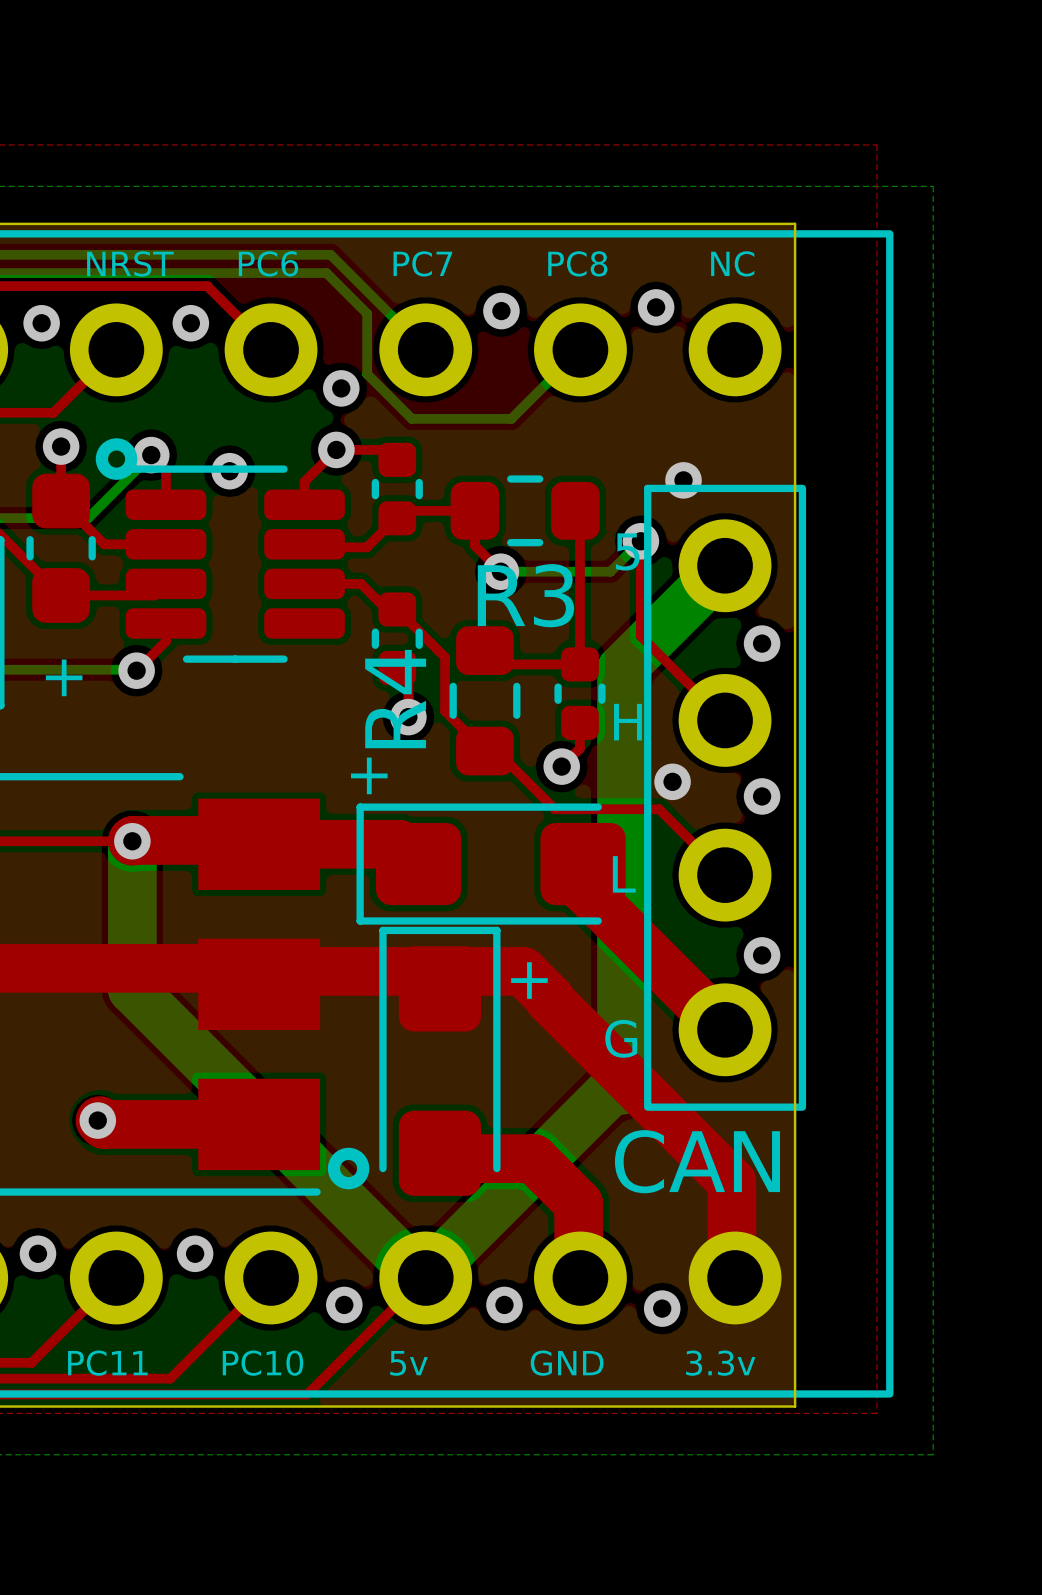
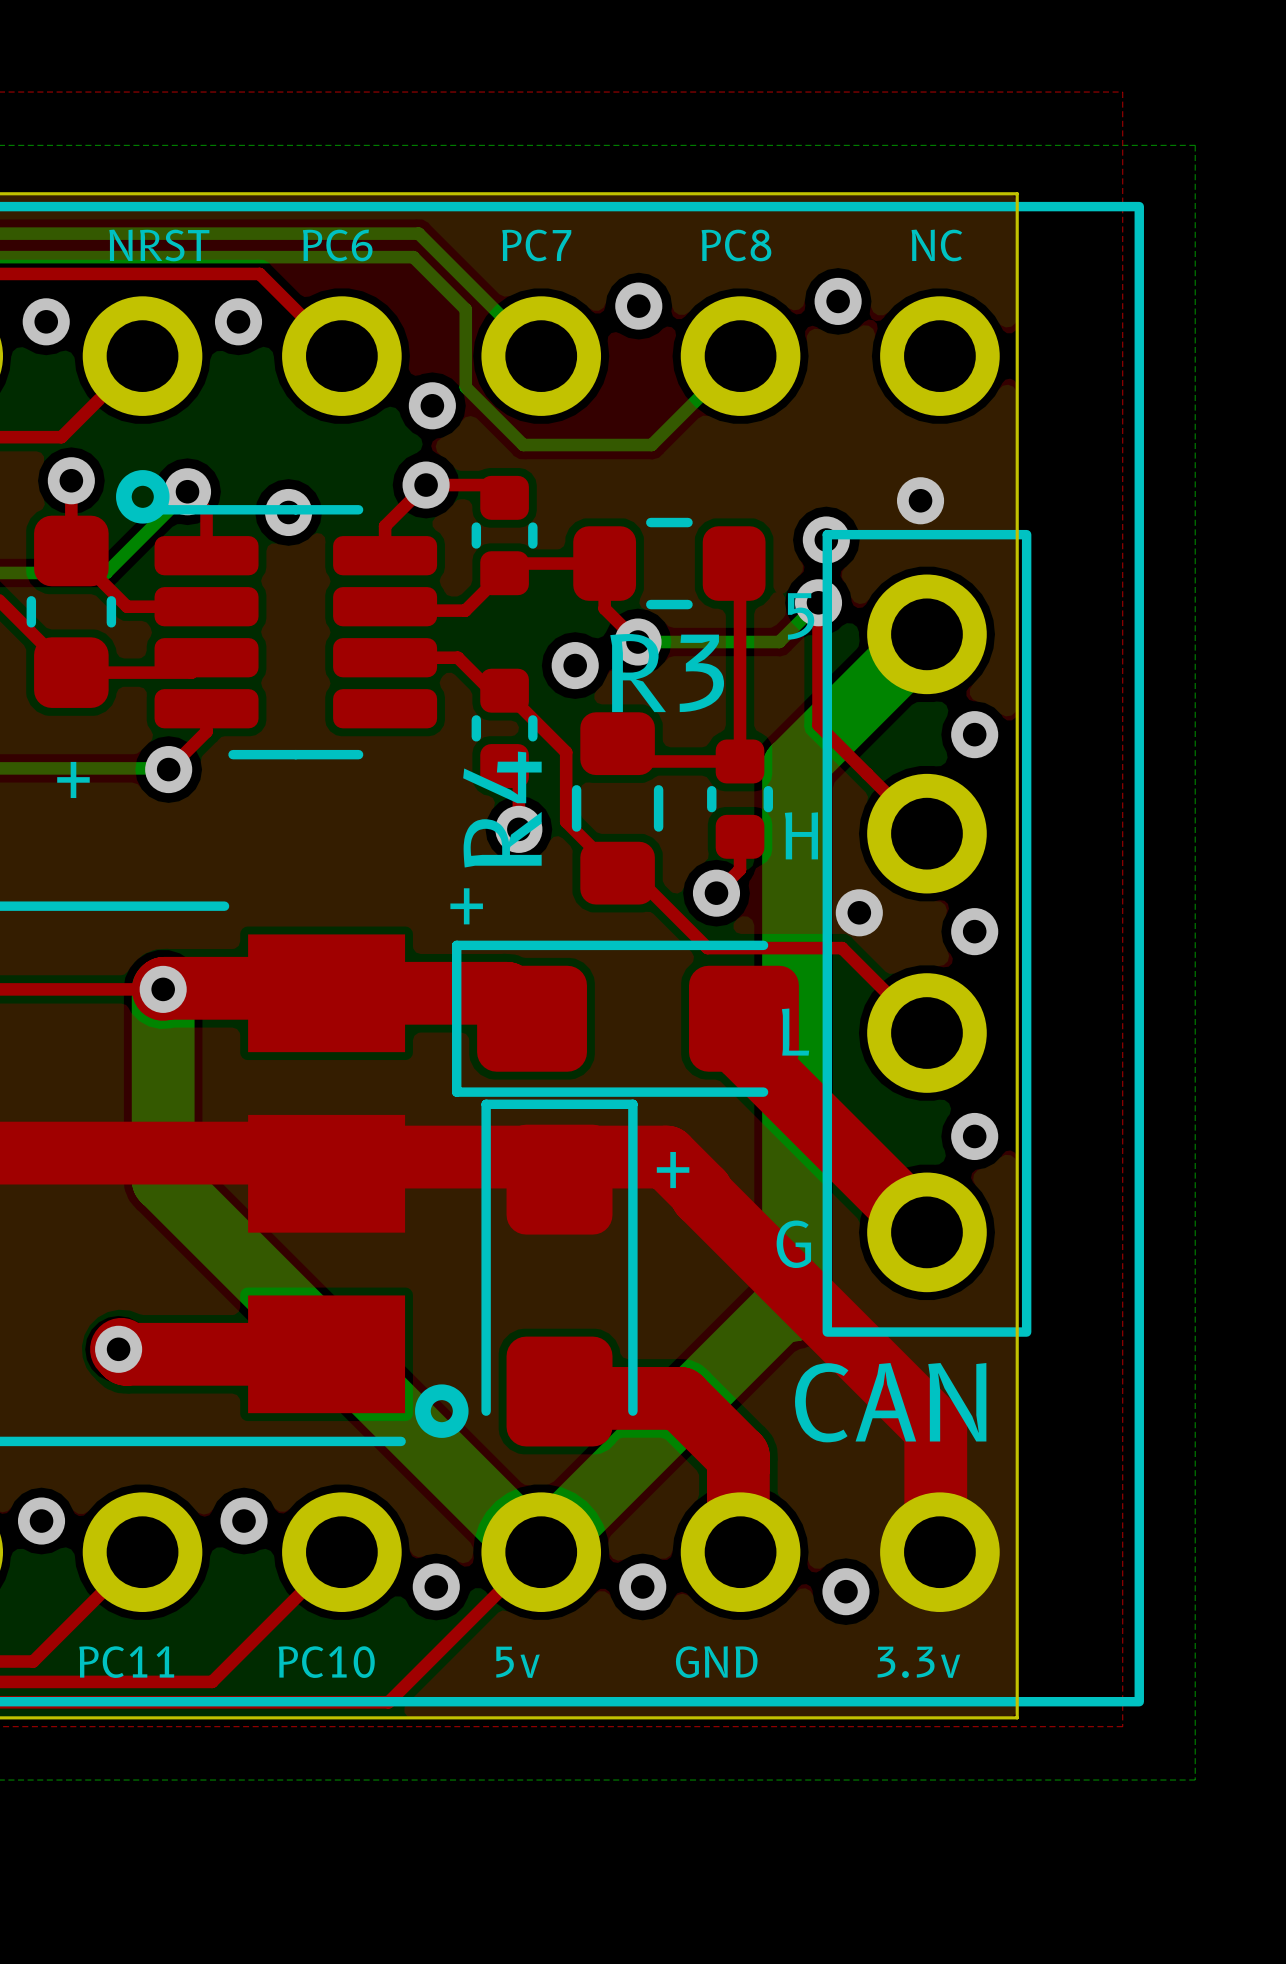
via: none -> (920, 500)
via: (683, 480) -> none
via: none -> (826, 540)
via: none -> (575, 665)

